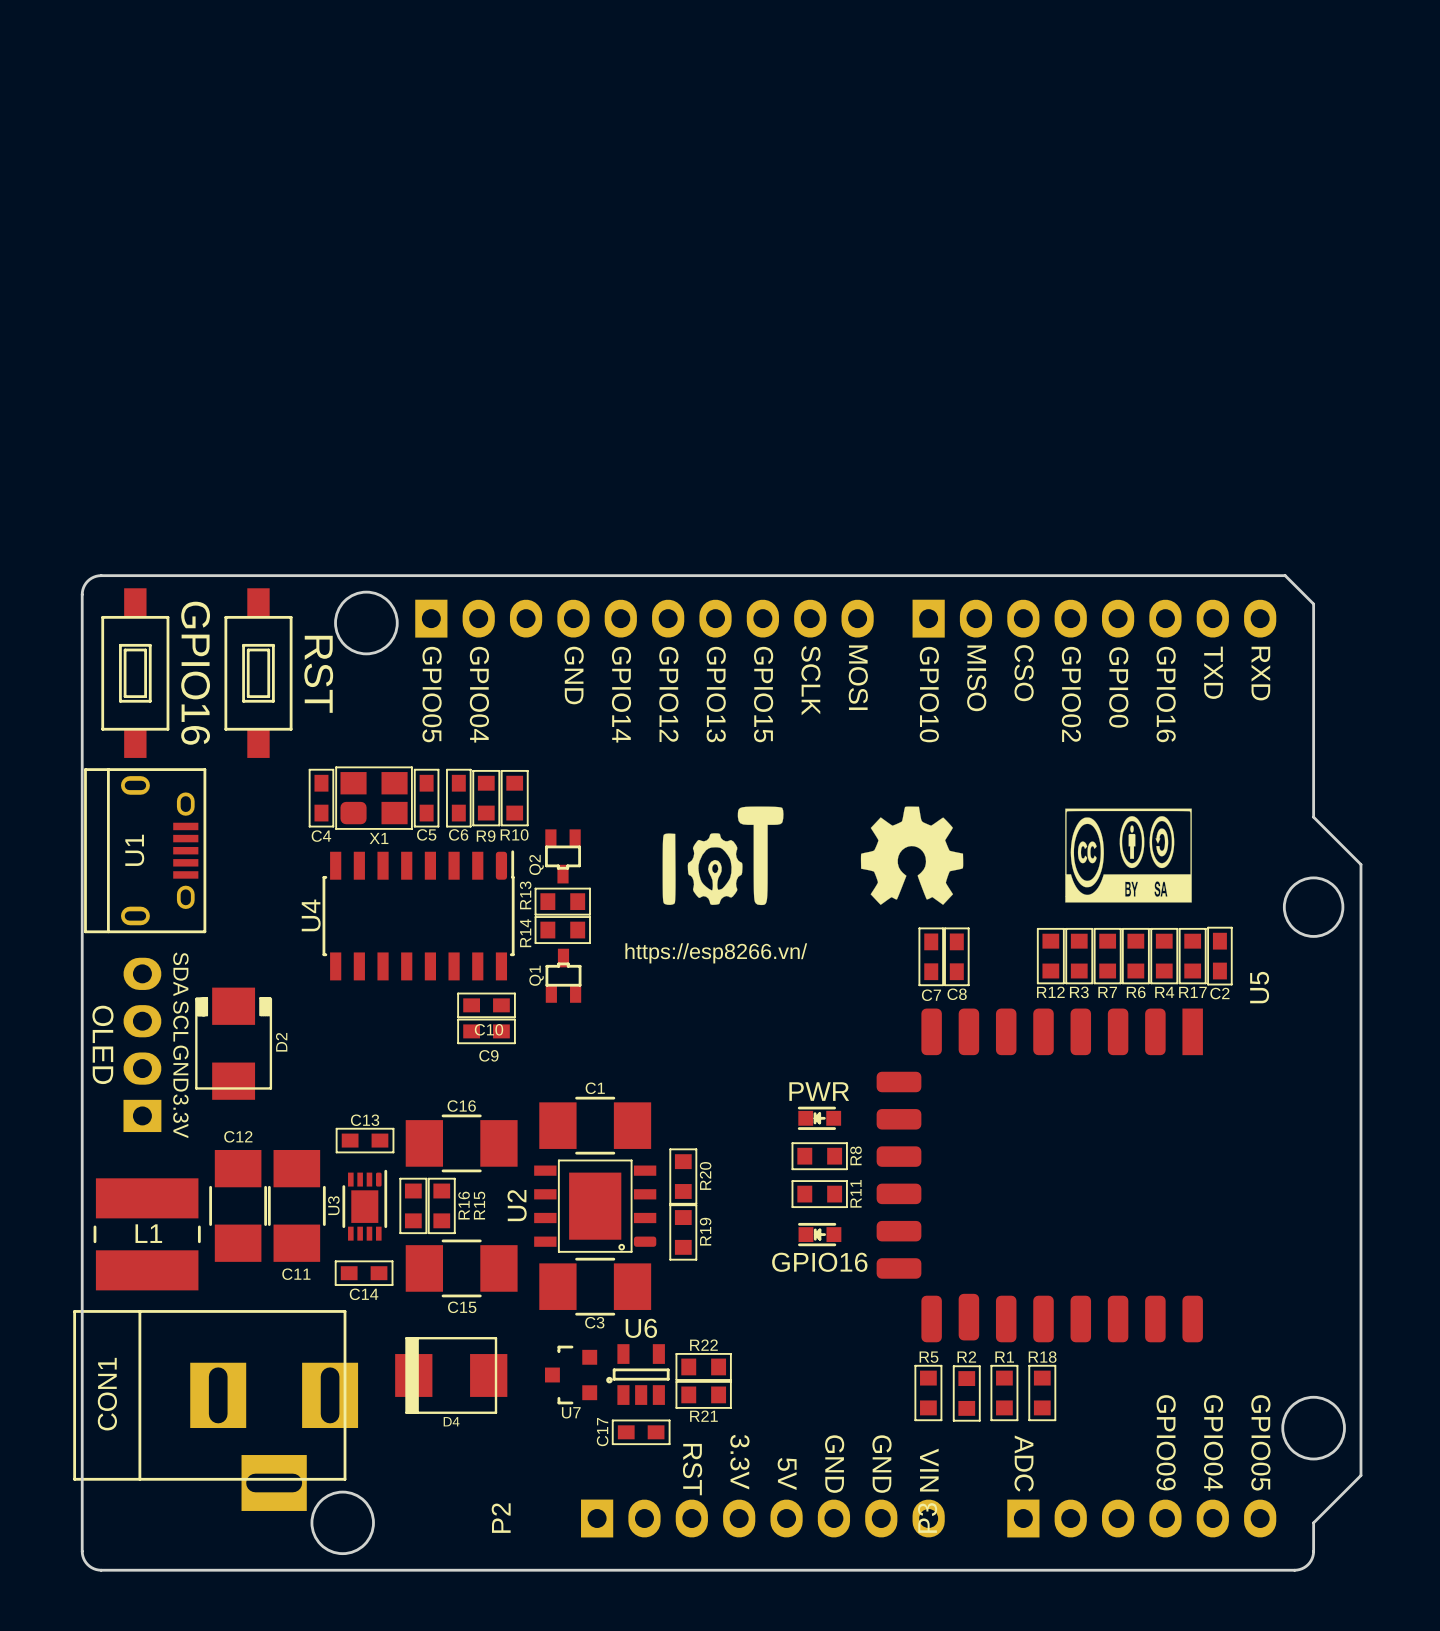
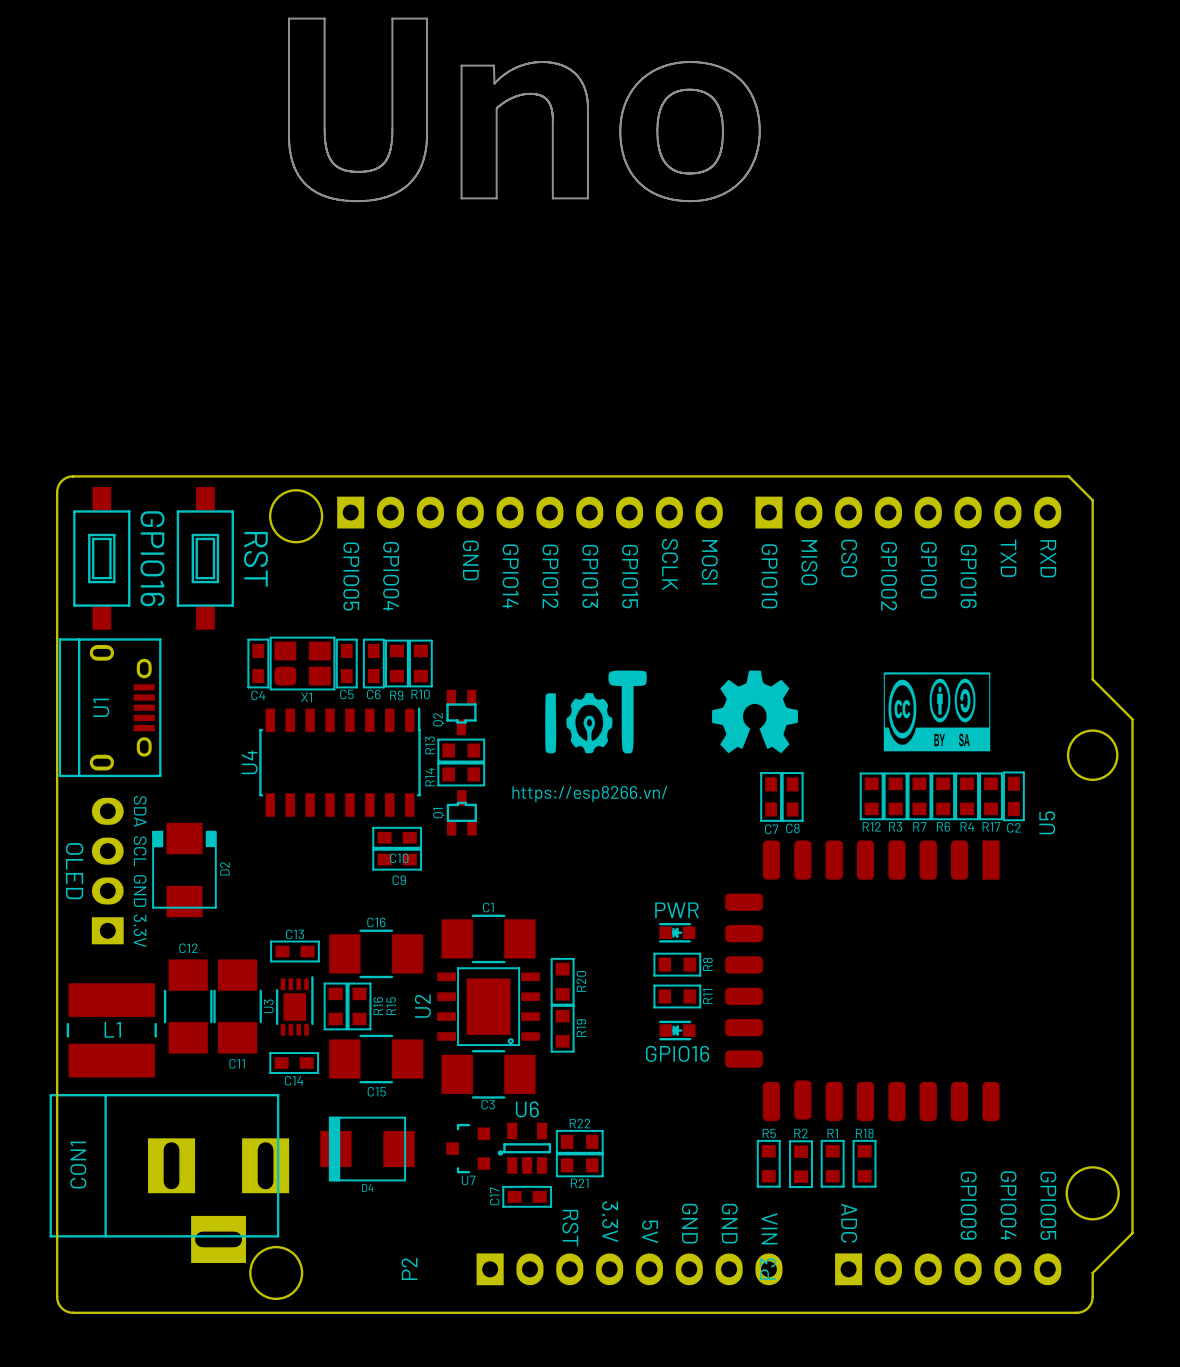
line: none -> (288, 18) (324, 18) (326, 147) (330, 159) (336, 166) (346, 170) (358, 171) (370, 170) (380, 166) (386, 159) (390, 148) (392, 18) (426, 18) (425, 149) (417, 172) (401, 189) (376, 199) (343, 200) (317, 192) (299, 176) (292, 161) (289, 142) (288, 18)
line: none -> (539, 62) (554, 63) (568, 68) (578, 76) (584, 88) (587, 107) (587, 198) (552, 198) (551, 109) (544, 97) (529, 93) (512, 97) (496, 108) (496, 198) (461, 198) (461, 65) (493, 65) (494, 83) (514, 68) (539, 62)
line: none -> (686, 62) (714, 65) (737, 77) (753, 97) (759, 123) (757, 152) (744, 177) (724, 193) (698, 200) (668, 198) (644, 187) (627, 167) (620, 139) (623, 109) (628, 97) (636, 85) (646, 75) (658, 68) (686, 62)
line: none -> (687, 89) (673, 93) (663, 102) (658, 118) (657, 138) (661, 155) (667, 165) (679, 172) (693, 173) (707, 169) (717, 160) (722, 145) (722, 124) (719, 108) (712, 97) (701, 91) (687, 89)

